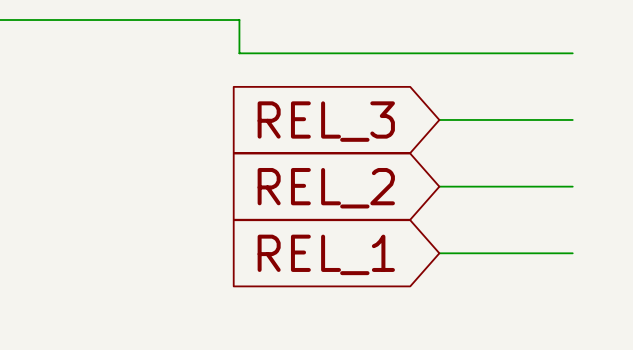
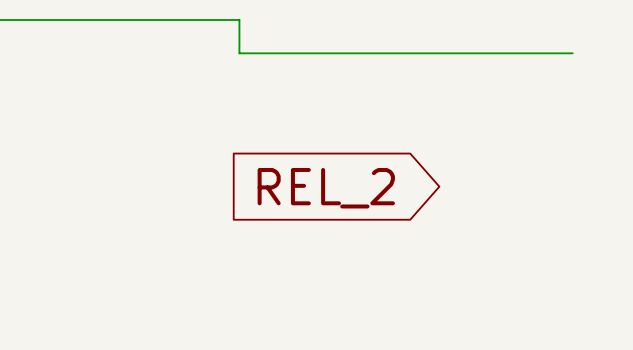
wire: (439, 119) (572, 119) -> none
global label: REL_3 (326, 121) -> none
wire: (439, 186) (572, 186) -> none
wire: (439, 253) (572, 253) -> none
global label: REL_1 (326, 254) -> none

